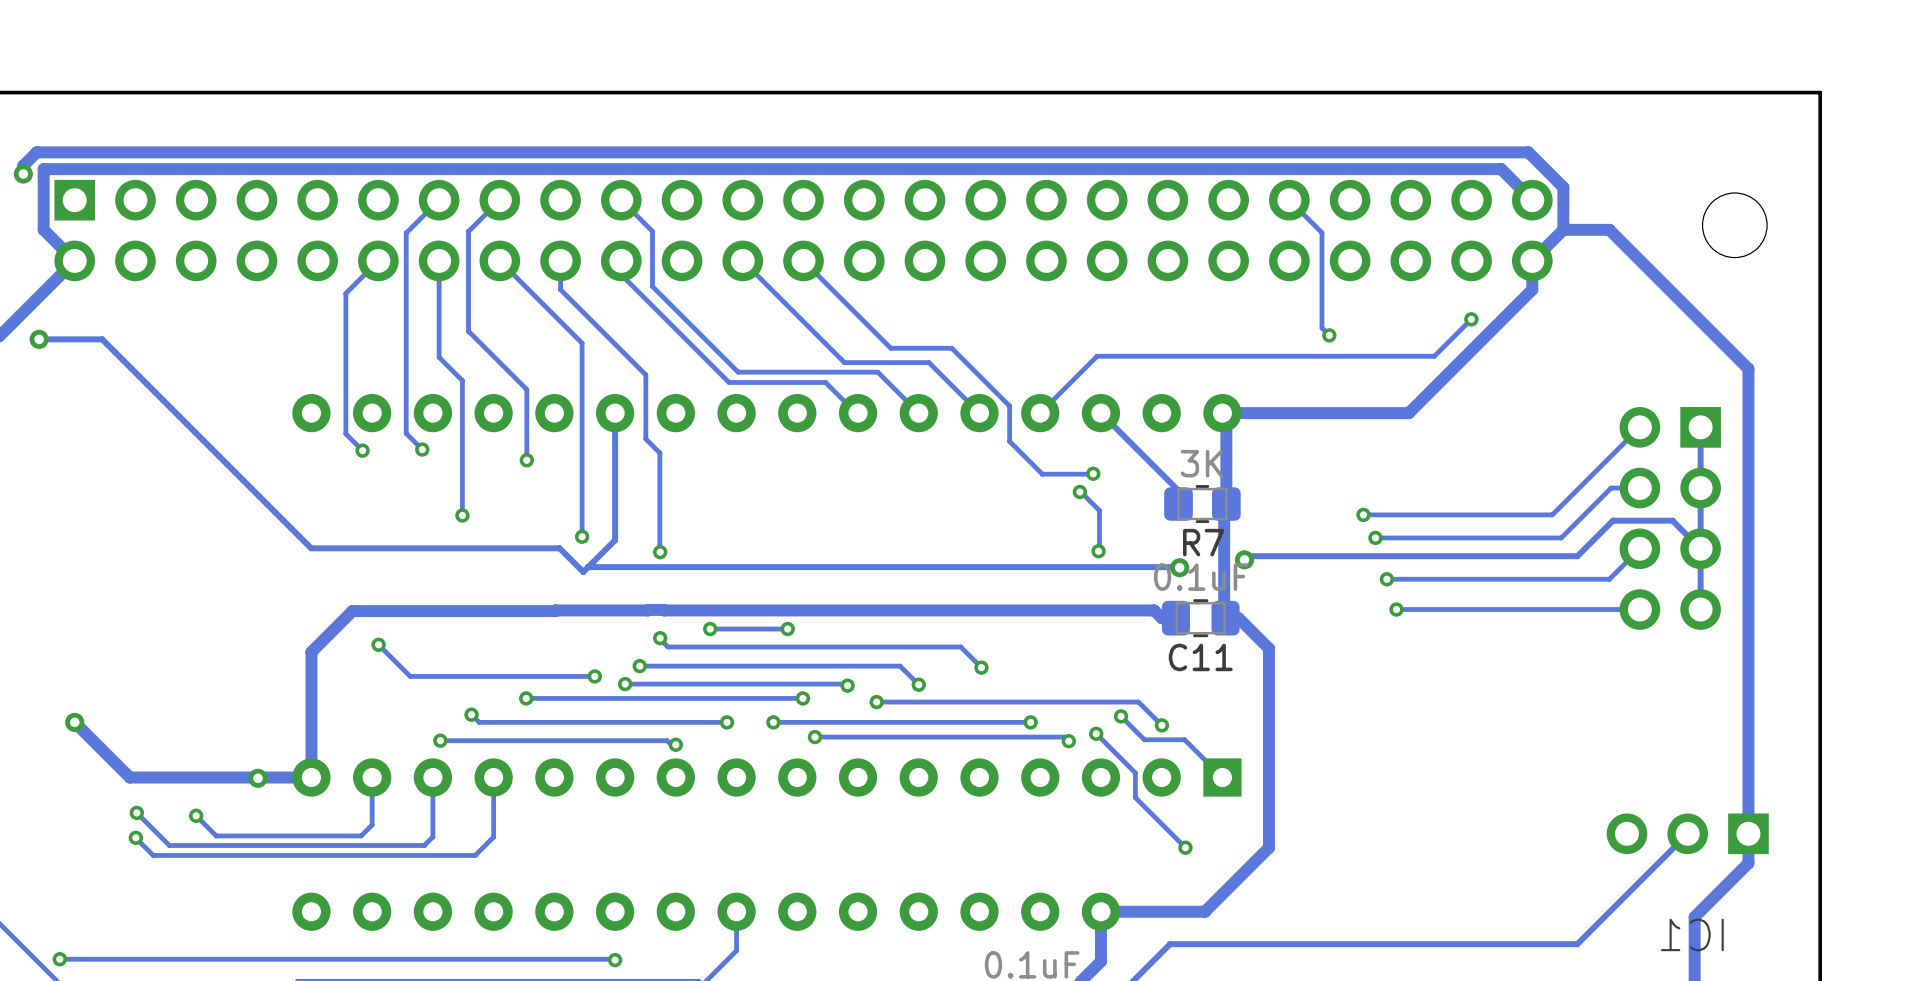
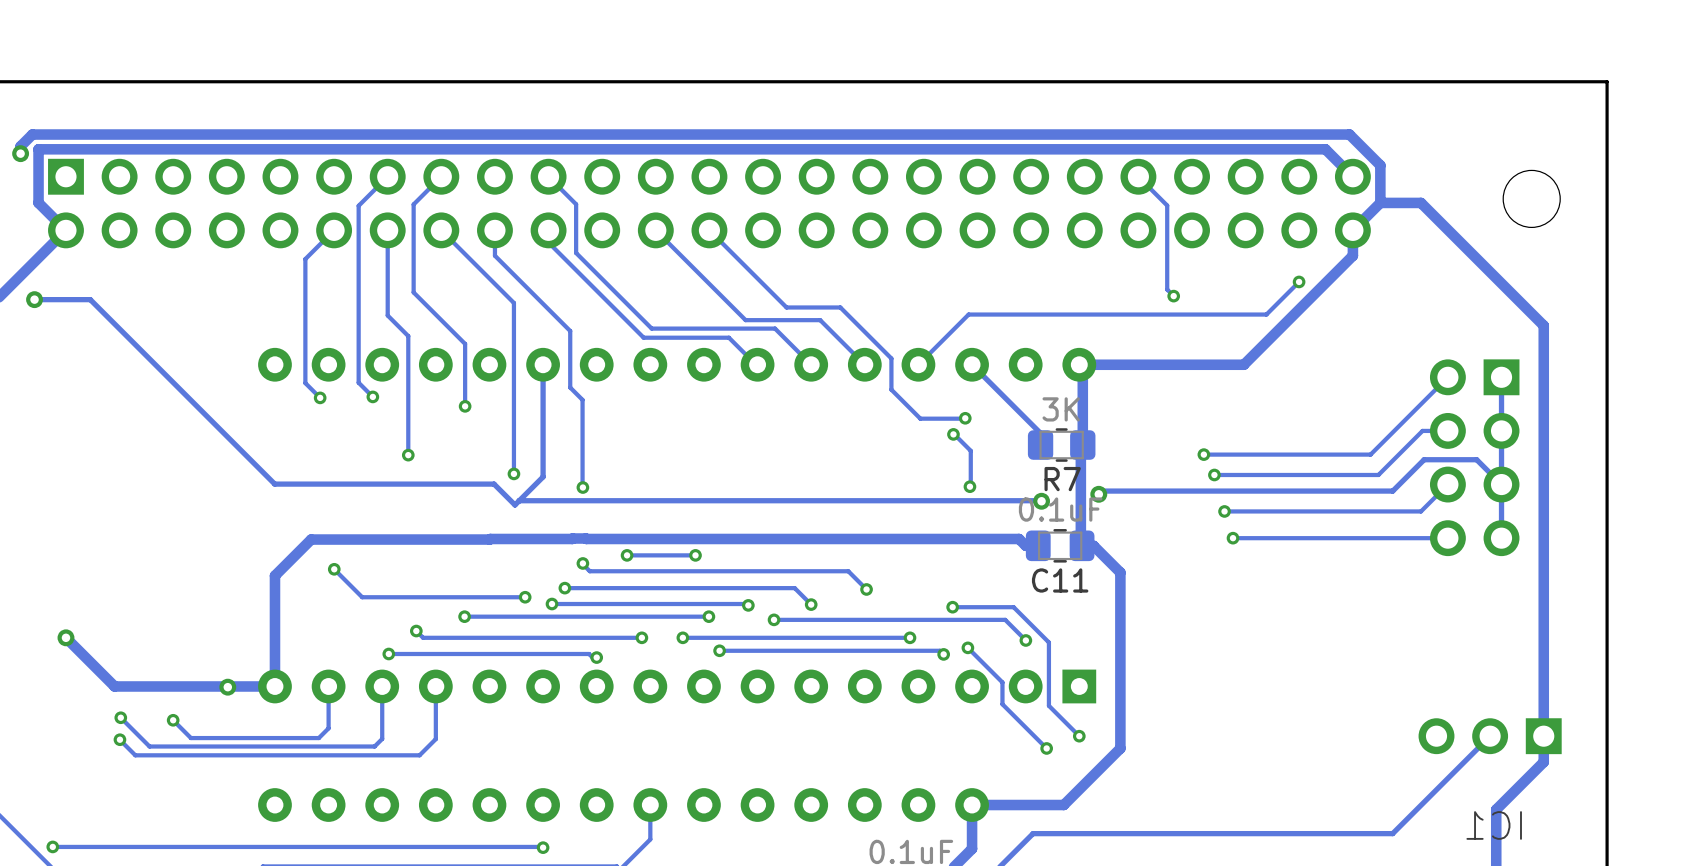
track: none -> (952, 607) (1013, 607) (1048, 642) (1048, 705) (1079, 736)
track: (1121, 716) (1144, 739) (1184, 739) (1222, 777) -> none
via position: (1121, 716) -> (952, 607)
via: none -> (1079, 736)

